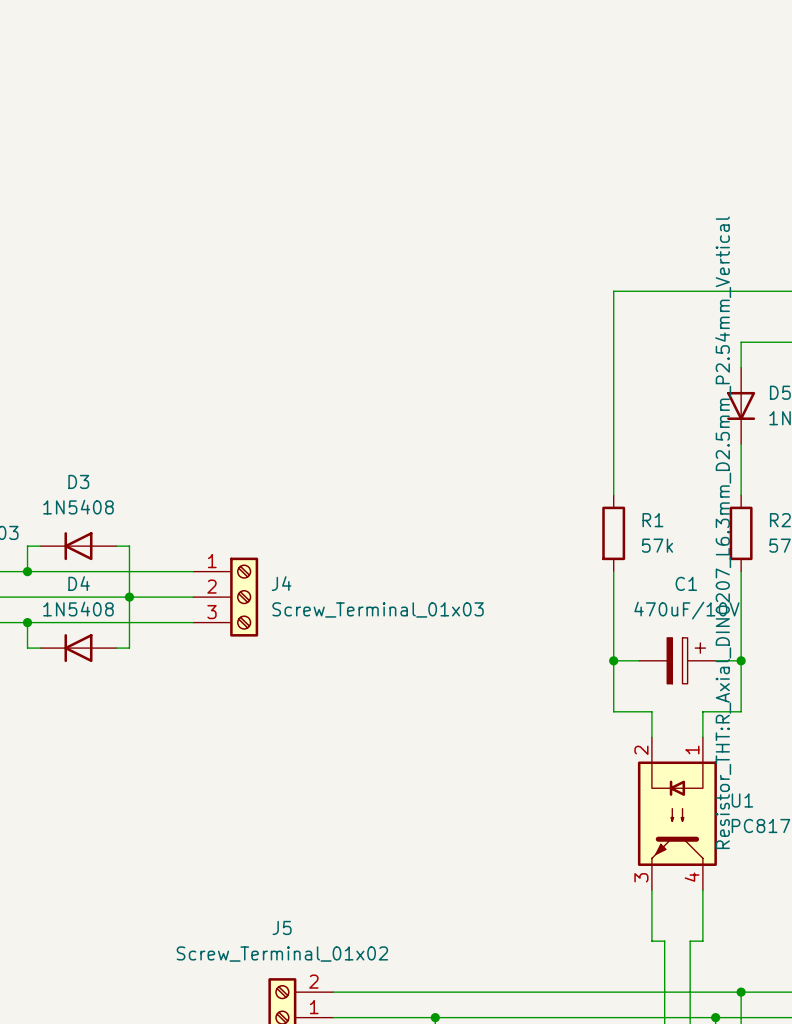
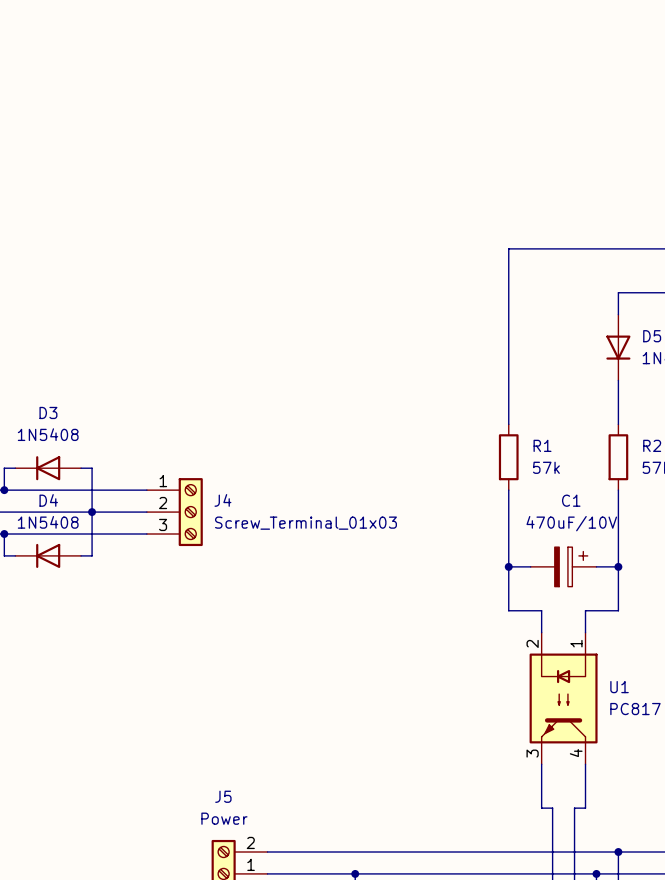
R2 text: Resistor_THT:R_Axial_DIN0207_L6.3mm_D2.5mm_P2.54mm_Vertical (723, 532) -> none
J5 value: Screw_Terminal_01x02 (282, 954) -> Power (224, 818)

